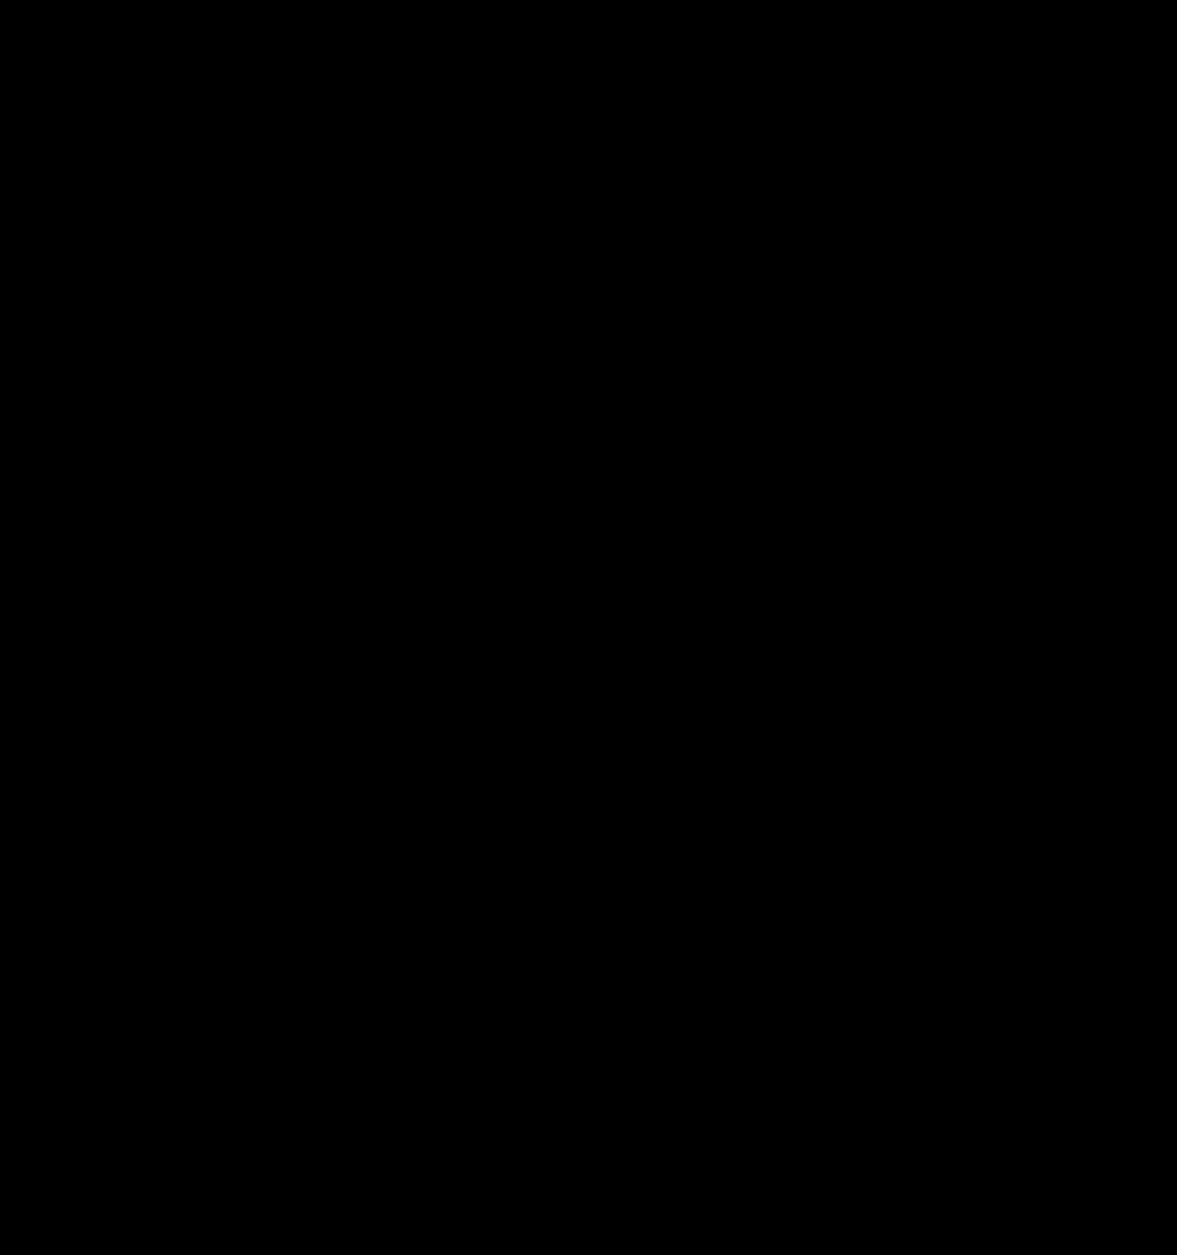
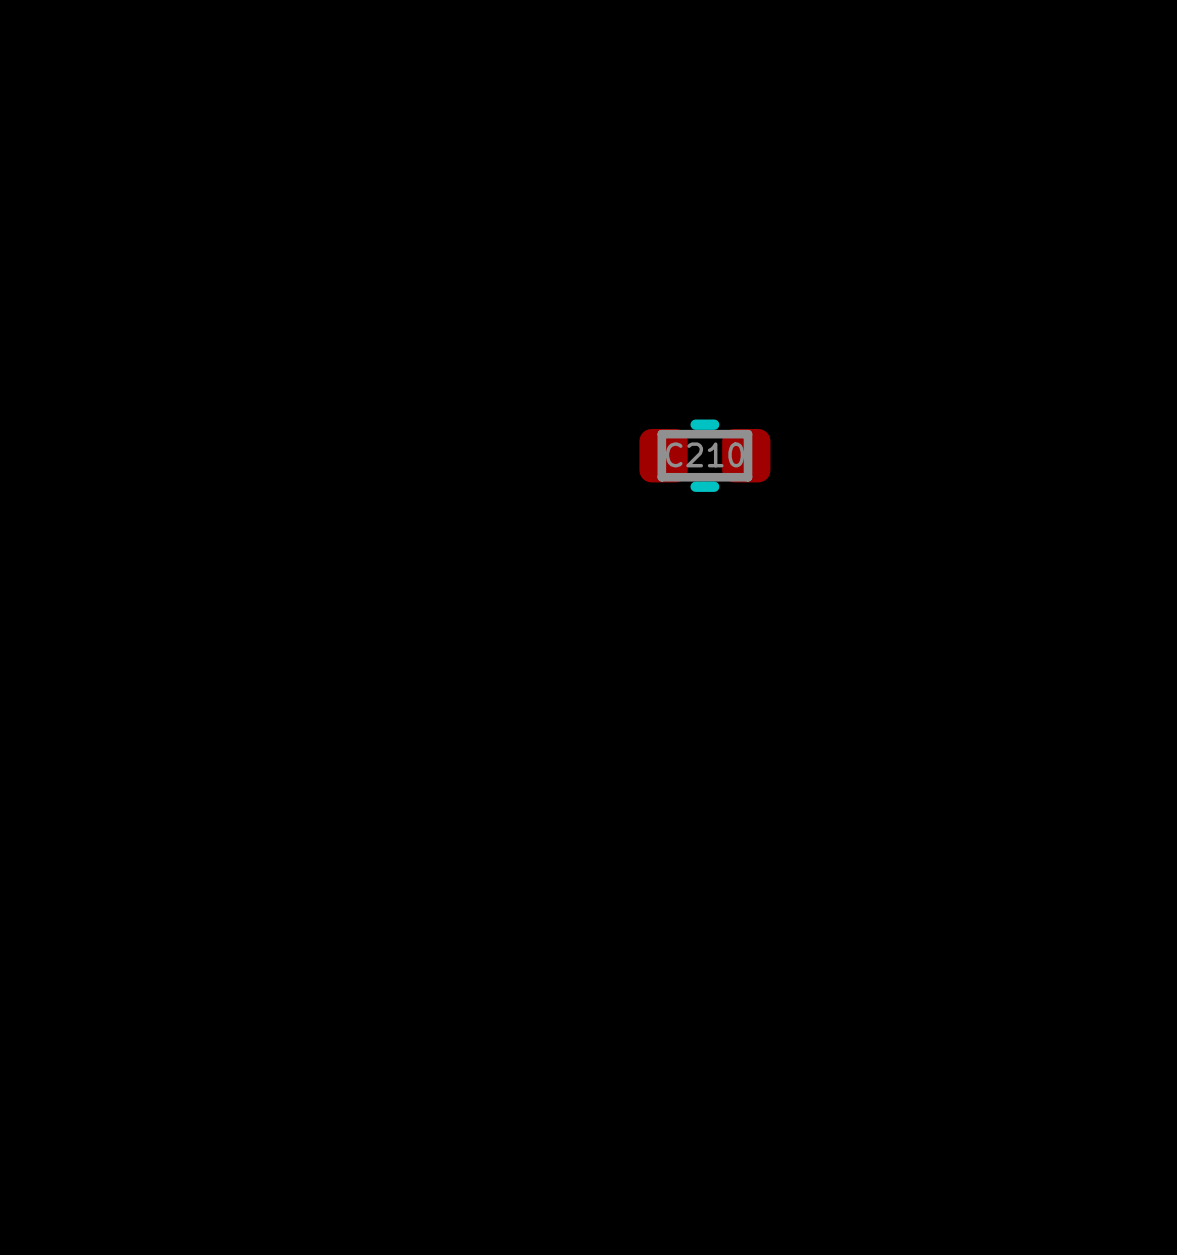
C210: none -> (704, 455)

